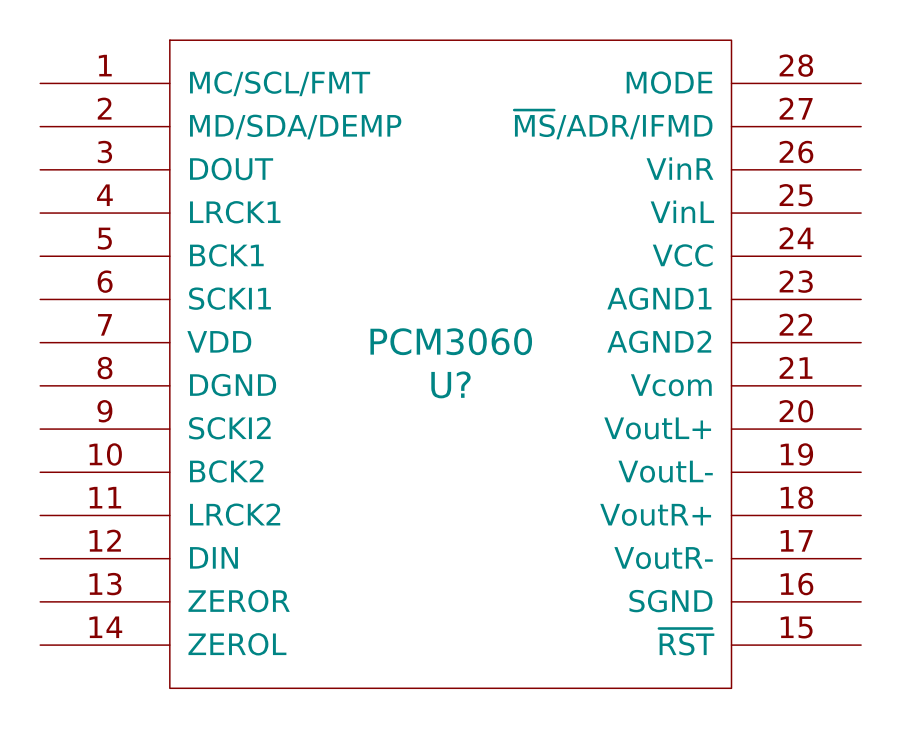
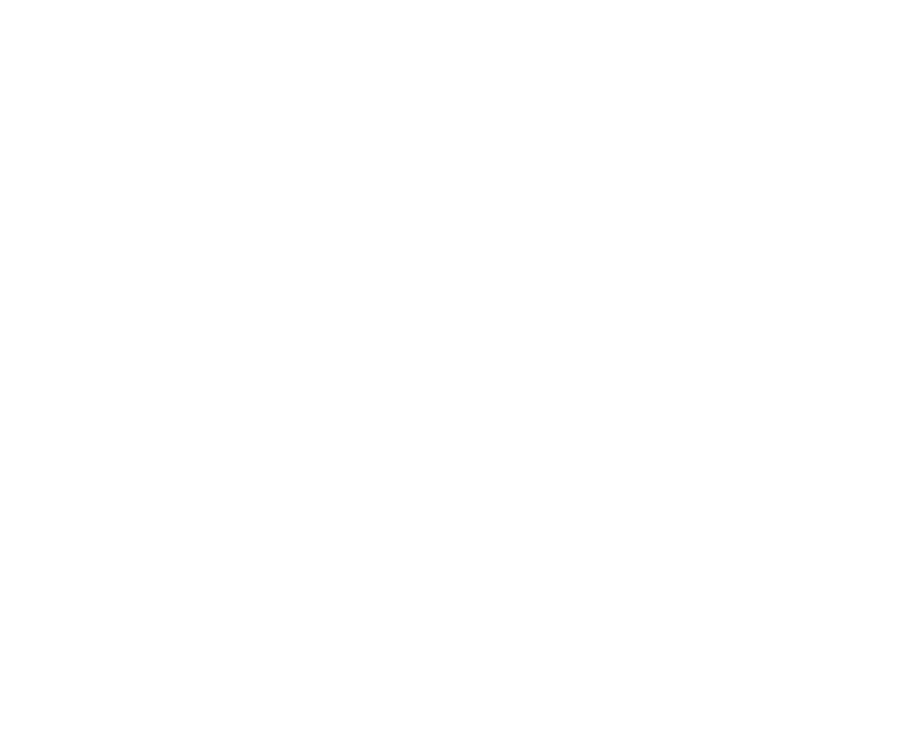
U?: PCM3060 (450, 364) -> none

